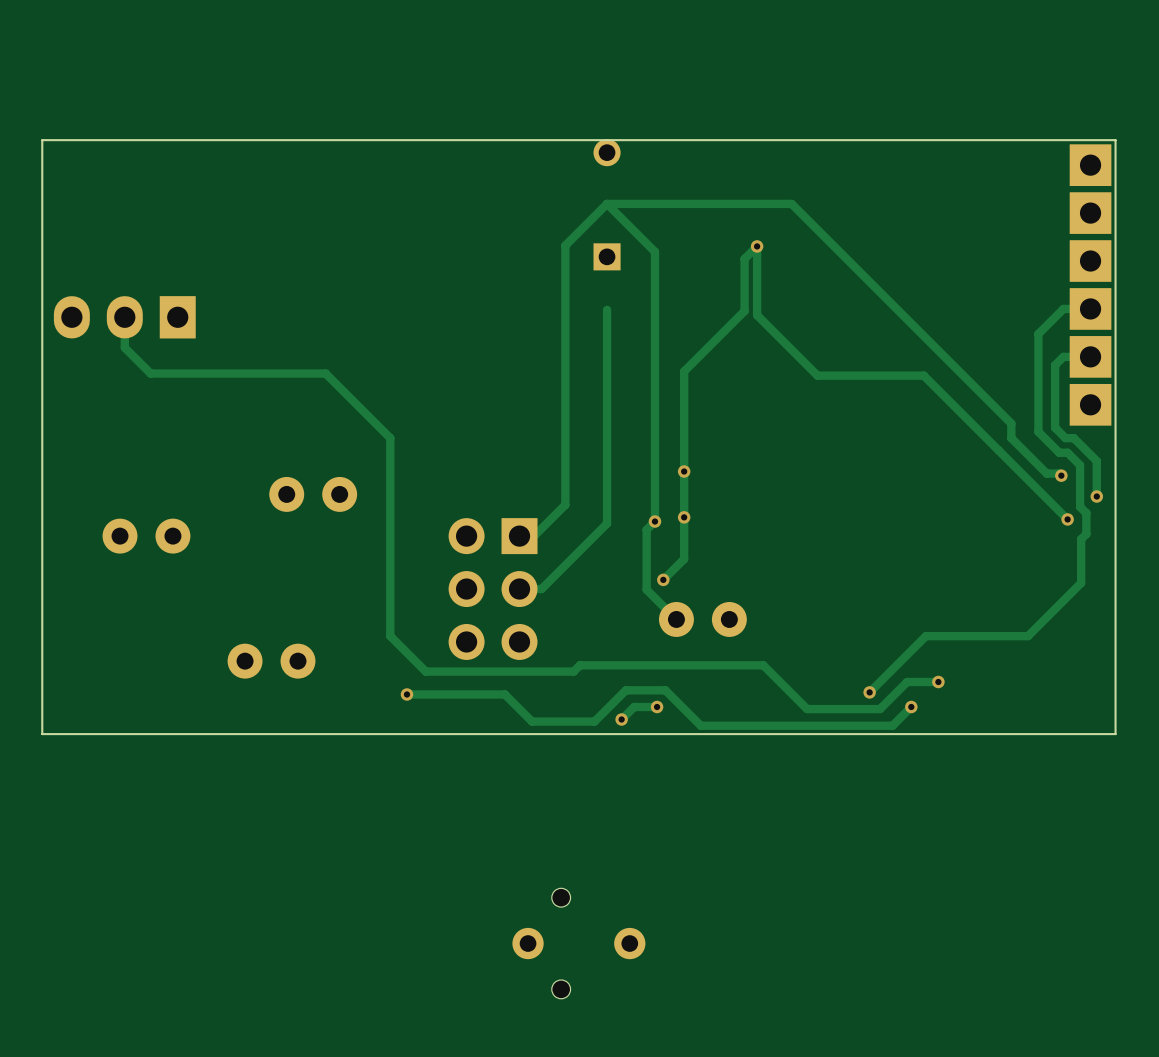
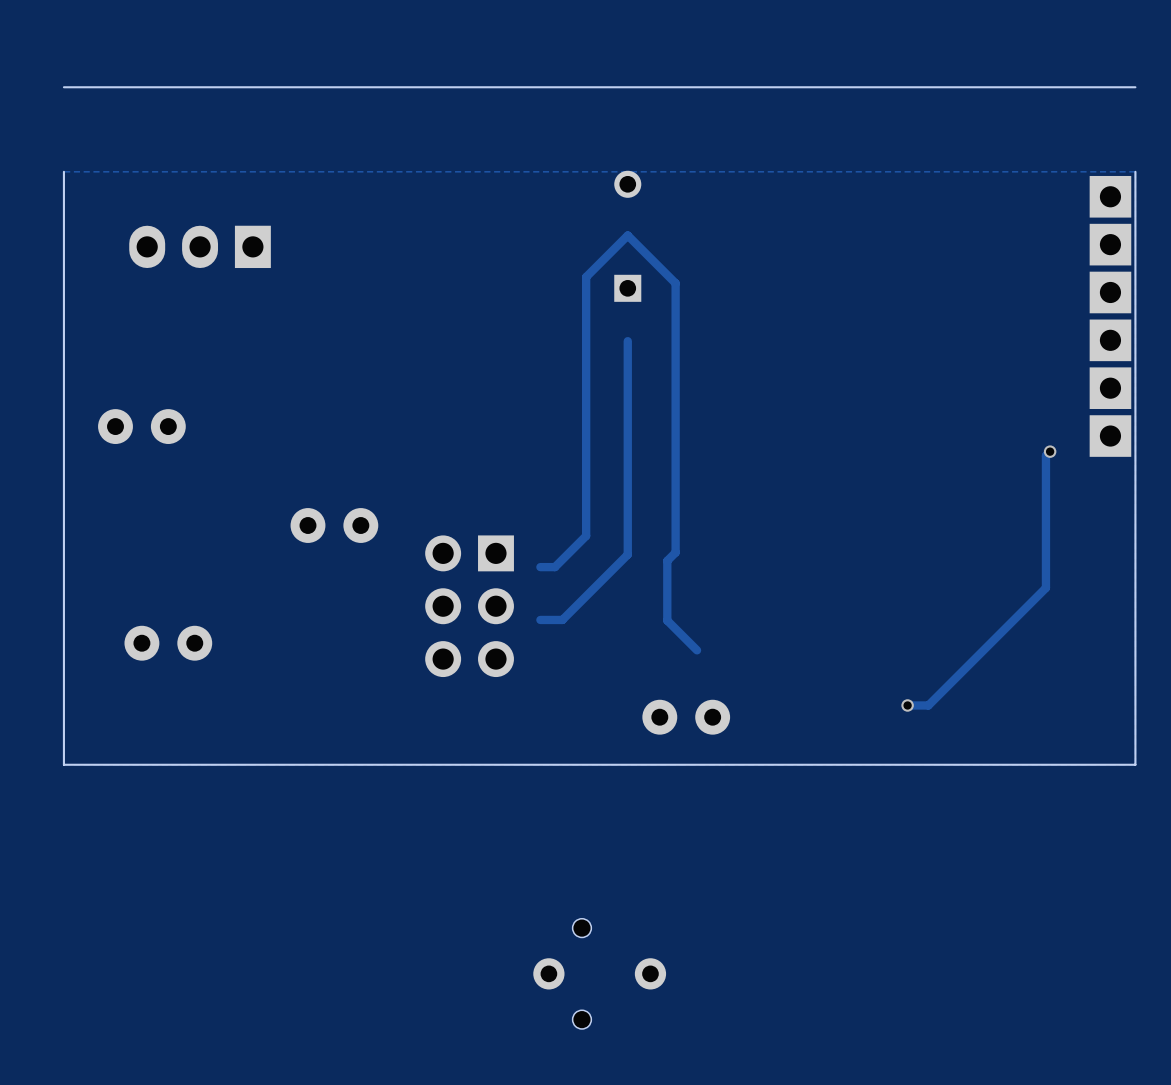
board edge: (1115, 140) (42, 140) -> (1135, 87) (63, 87)
track: (607, 203) (791, 203) (1011, 423) (1011, 438) (1046, 473) (1059, 473) (1061, 475) -> none
via: (757, 246) -> none
track: (1090, 308) (1063, 308) (1038, 333) (1038, 431) (1059, 452) (1067, 452) (1080, 465) (1080, 506) (1086, 513) (1086, 534) (1081, 539) (1081, 583) (1028, 636) (925, 636) (869, 692) -> none
track: (124, 317) (124, 347) (150, 373) (325, 373) (390, 438) (390, 636) (425, 671) (573, 671) (579, 665) (763, 665) (807, 709) (880, 709) (907, 681) (938, 681) -> none
part position: (124, 317) -> (200, 246)
track: (1090, 356) (1063, 356) (1055, 365) (1055, 427) (1065, 438) (1073, 438) (1096, 461) (1096, 496) -> none
part: none -> (141, 426)
track: none -> (1050, 451) (1045, 455) (1045, 587) (928, 705) (907, 705)
via: none -> (1050, 451)
via: (684, 471) -> none
via: (1061, 475) -> none
via: (1096, 496) -> none
via: (684, 517) -> none
track: (1067, 519) (923, 375) (817, 375) (757, 315) (757, 246) (744, 258) (744, 311) (684, 371) (684, 559) (663, 579) -> none
via: (1067, 519) -> none
via: (654, 521) -> none
part: (146, 536) -> none
via: (663, 579) -> none
part position: (493, 589) -> (469, 606)
part: none -> (168, 643)
part position: (702, 619) -> (686, 717)
part: (271, 661) -> none
via: none -> (907, 705)
via: (938, 681) -> none
via: (869, 692) -> none
track: (406, 694) (504, 694) (532, 721) (594, 721) (625, 690) (665, 690) (700, 725) (892, 725) (911, 707) -> none
via: (406, 694) -> none
track: (657, 707) (634, 707) (621, 719) -> none
via: (657, 707) -> none
via: (911, 707) -> none
via: (621, 719) -> none

